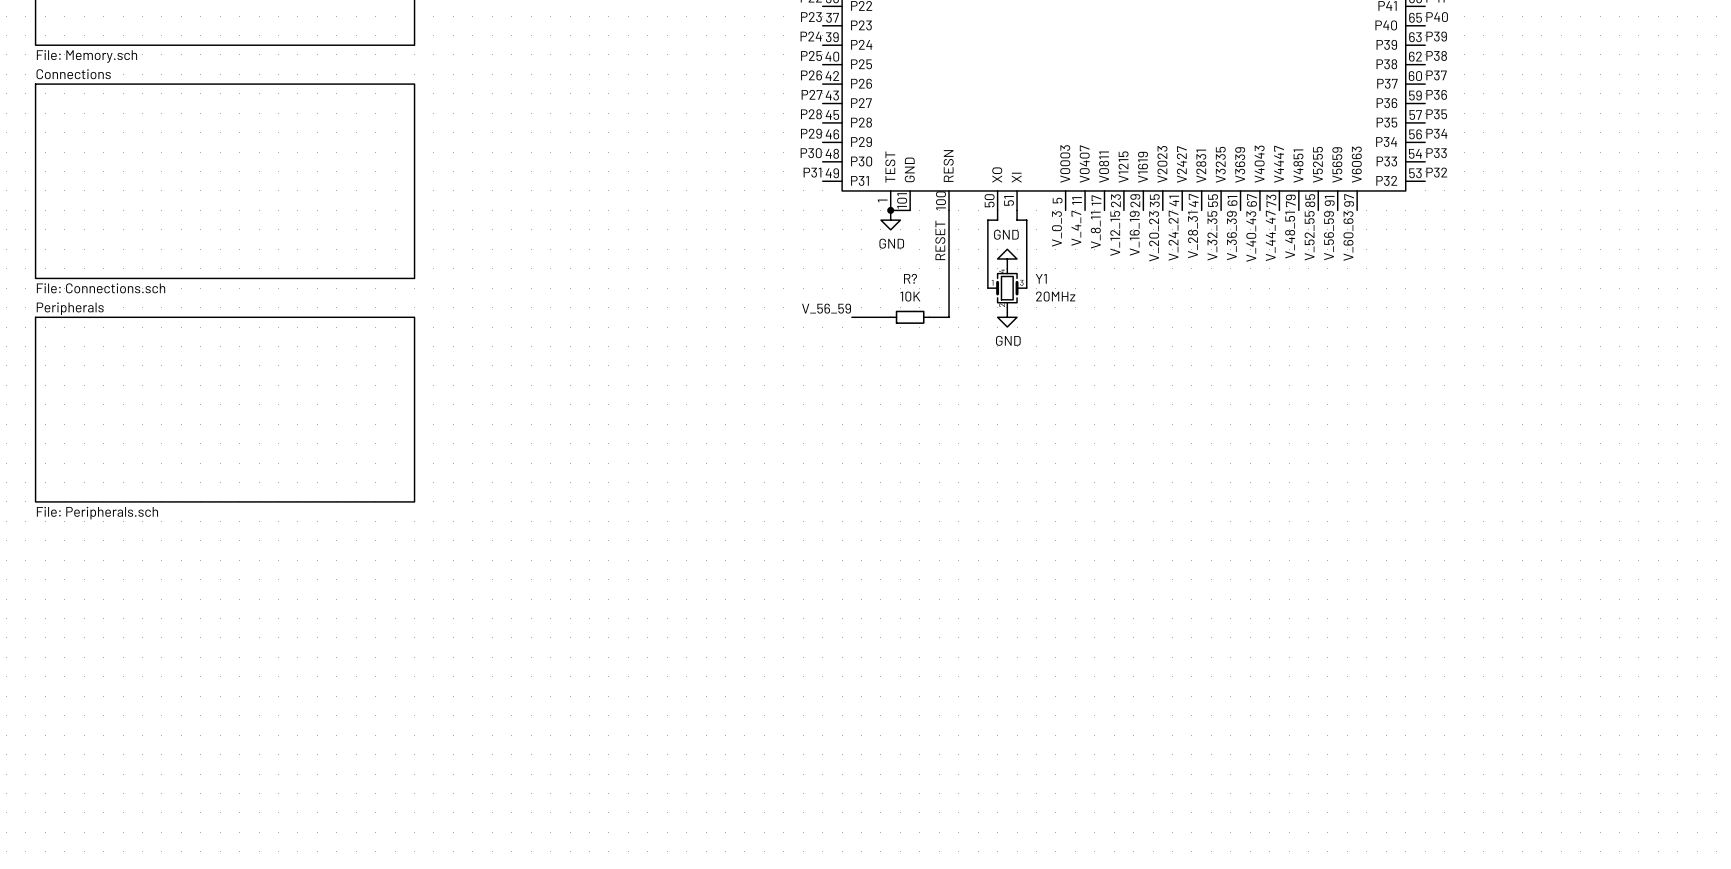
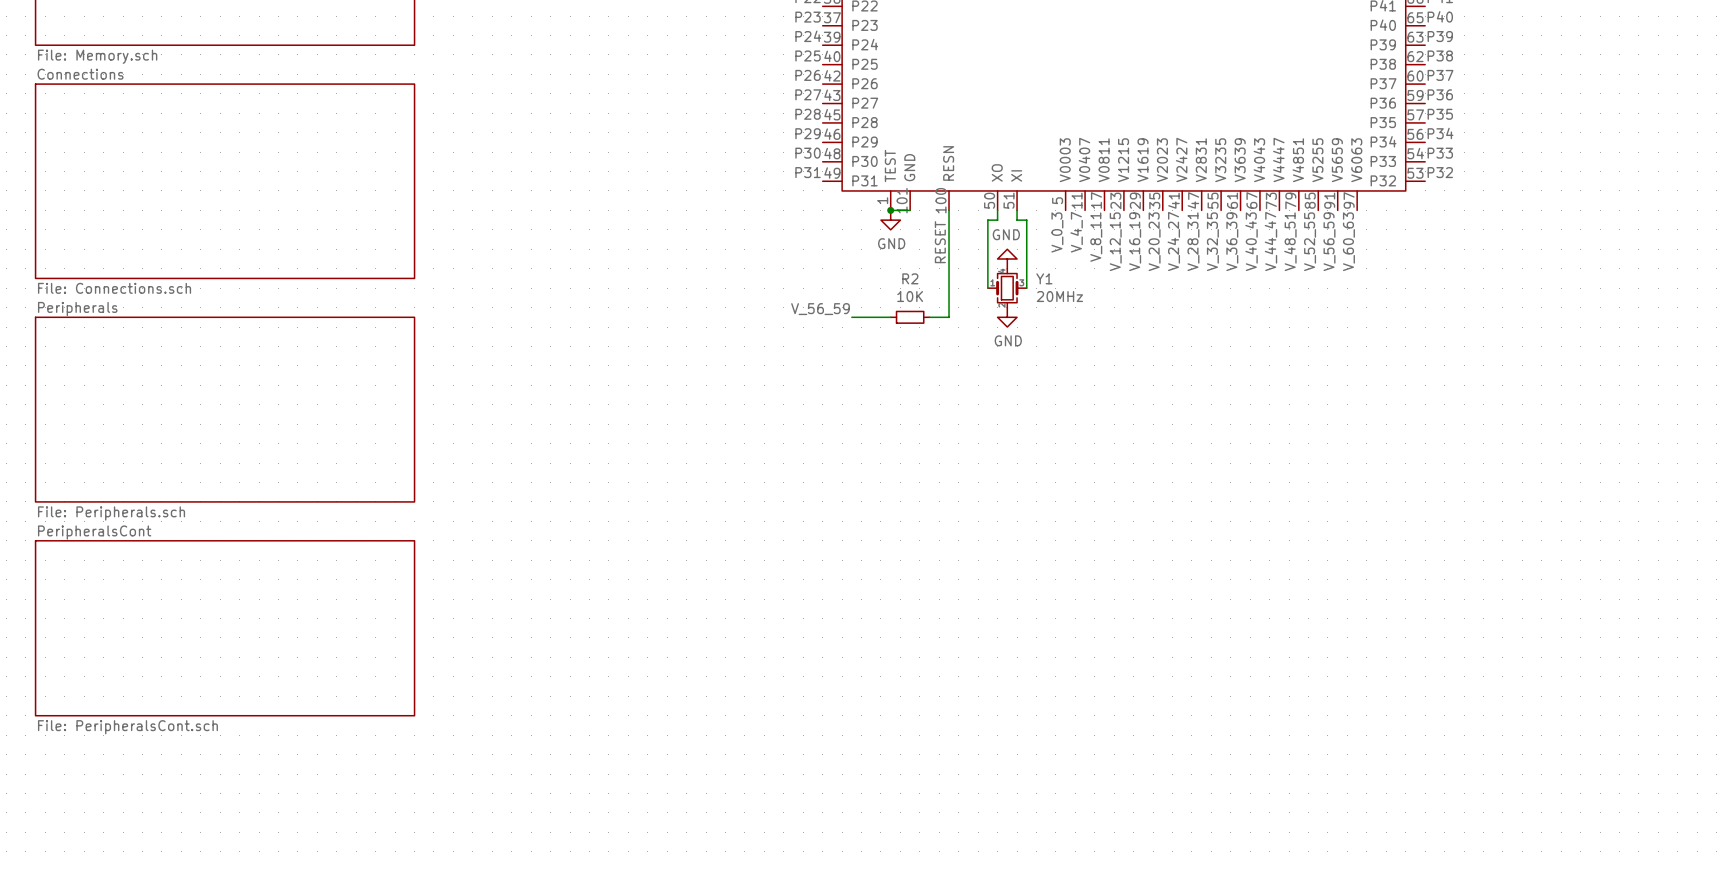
R? name: R? (910, 278) -> R2 (910, 278)
sheet PeripheralsCont: none -> File: PeripheralsCont.sch (225, 628)

